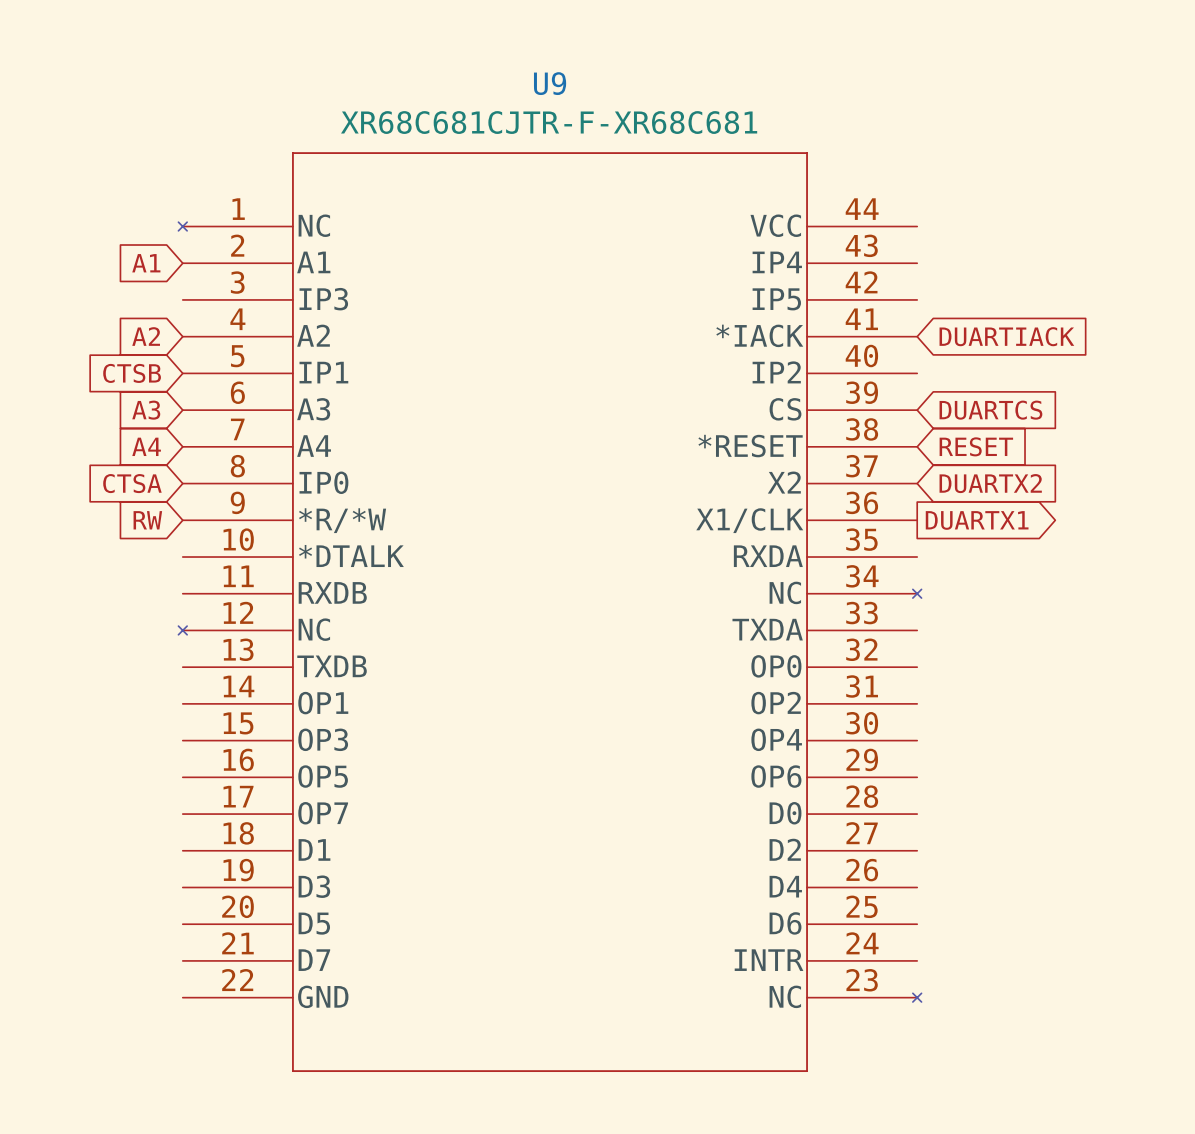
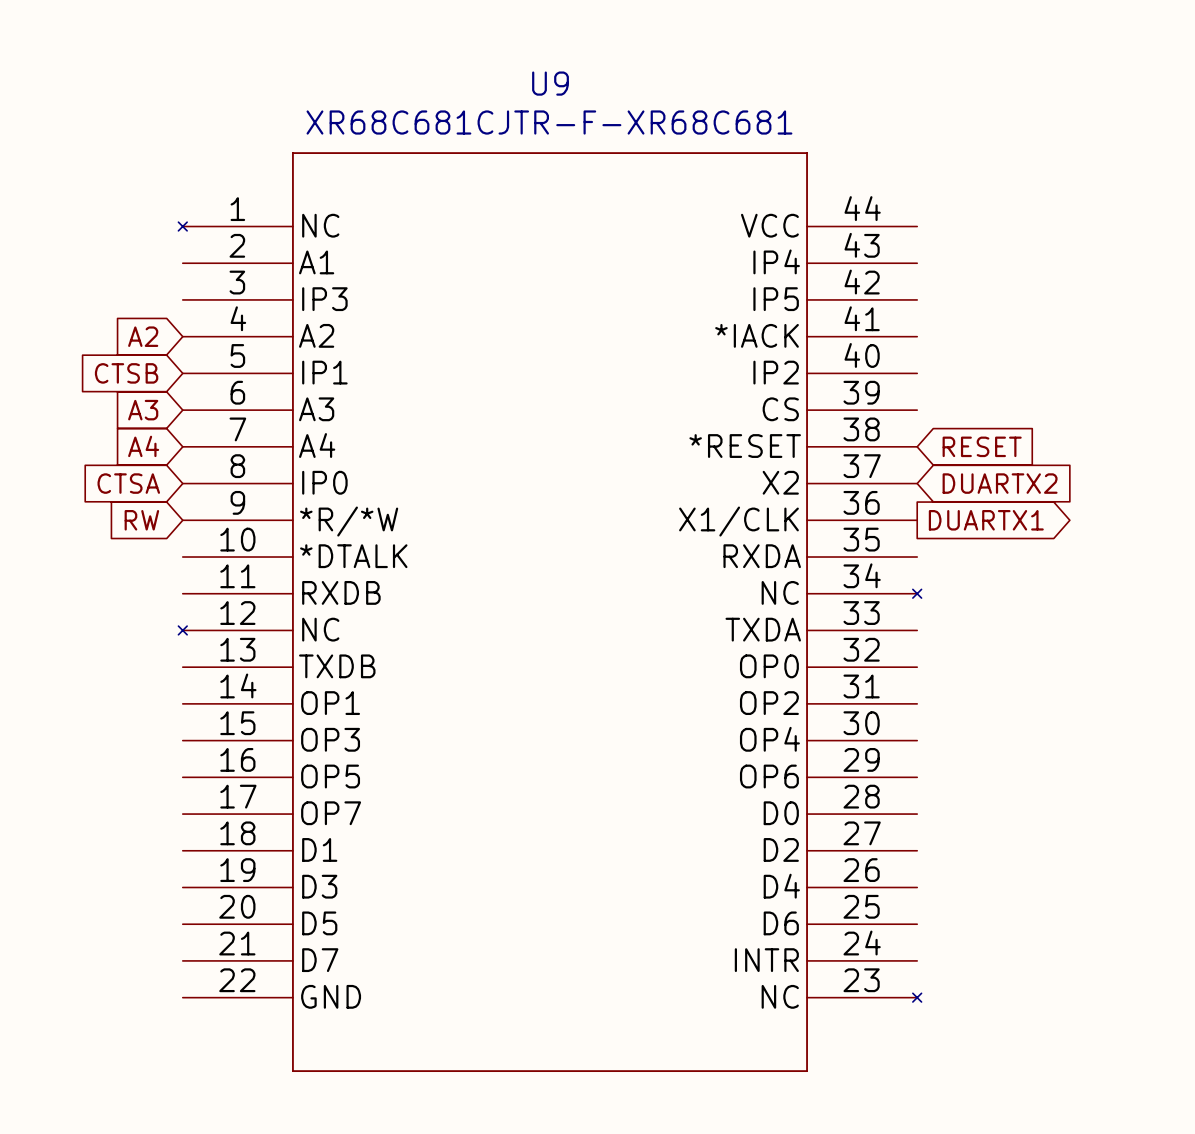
global label: A1 (146, 263) -> none
global label: DUARTIACK (1006, 336) -> none
global label: DUARTCS (990, 410) -> none

